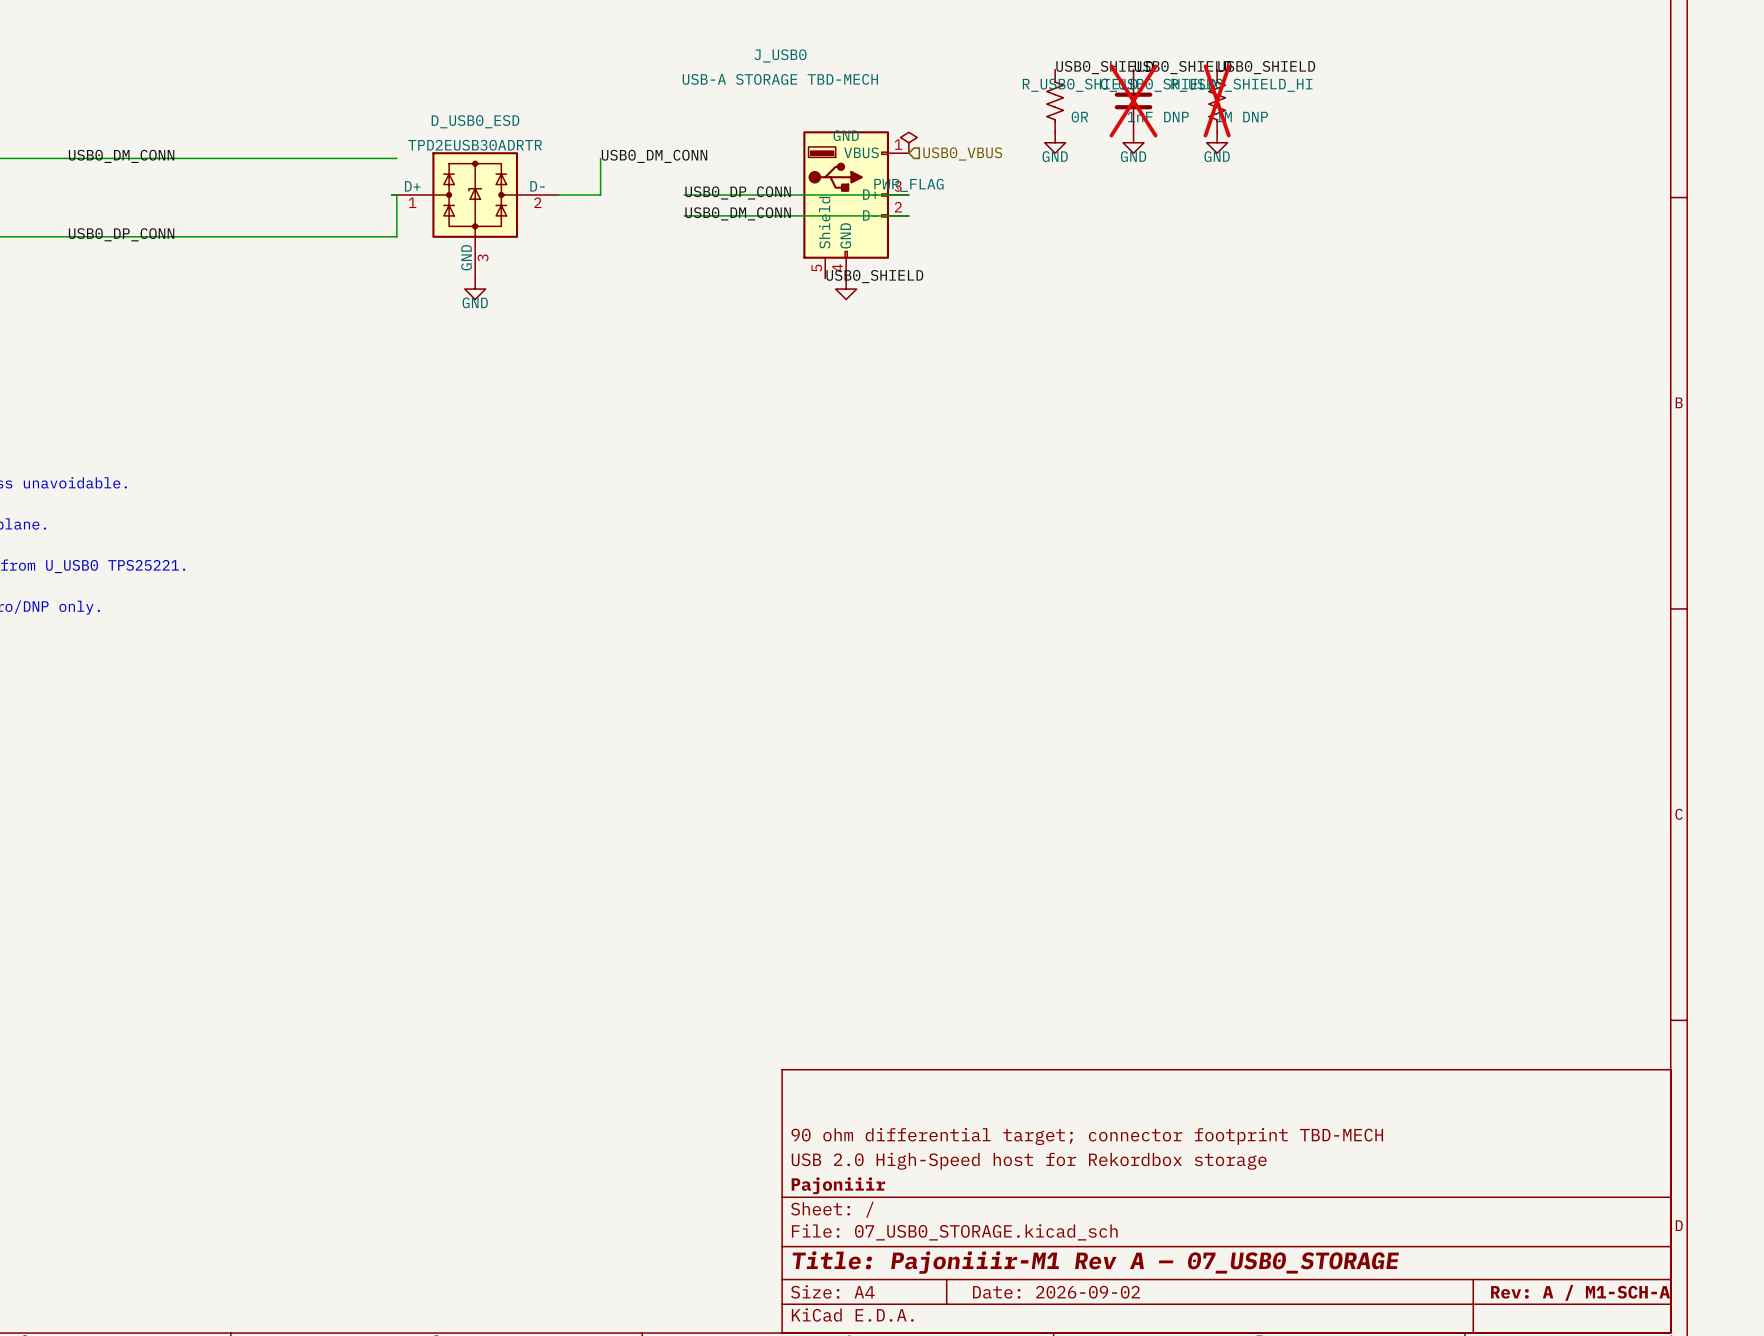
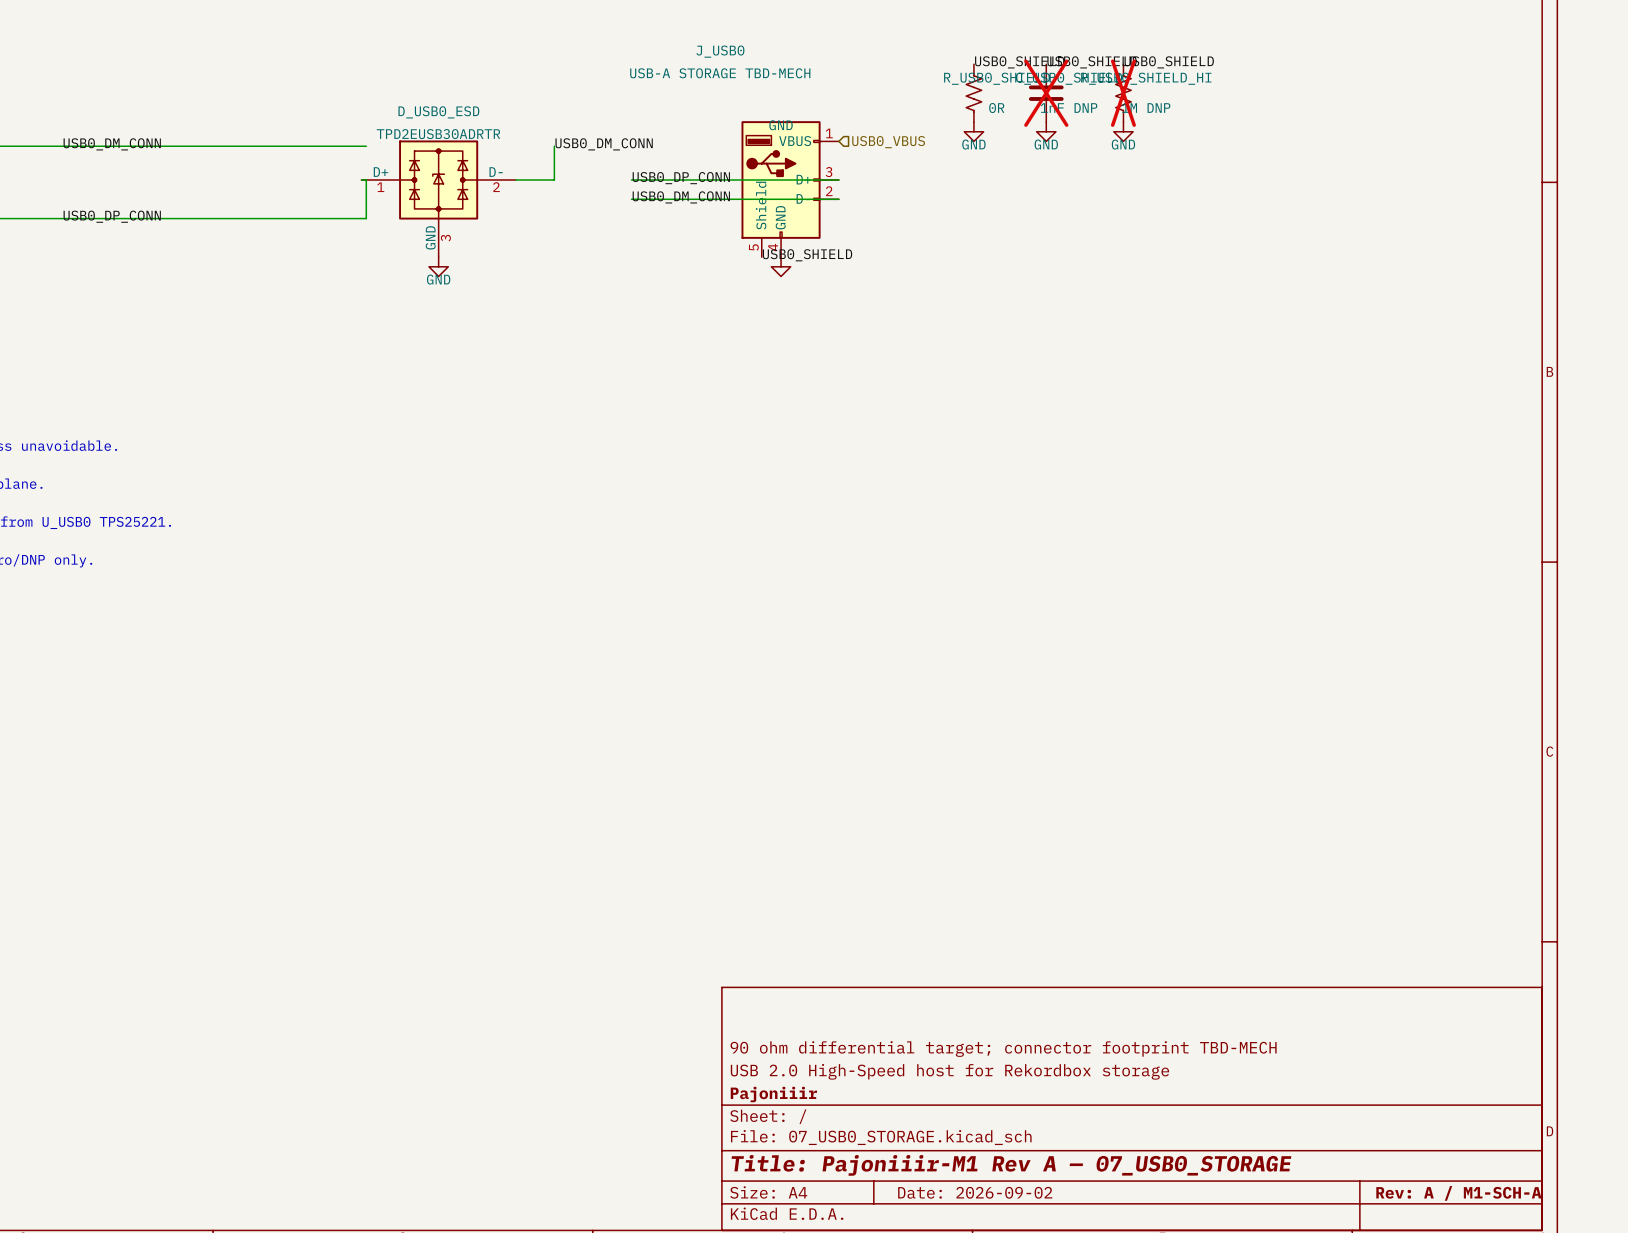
power symbol: PWR_FLAG (908, 142) -> none

